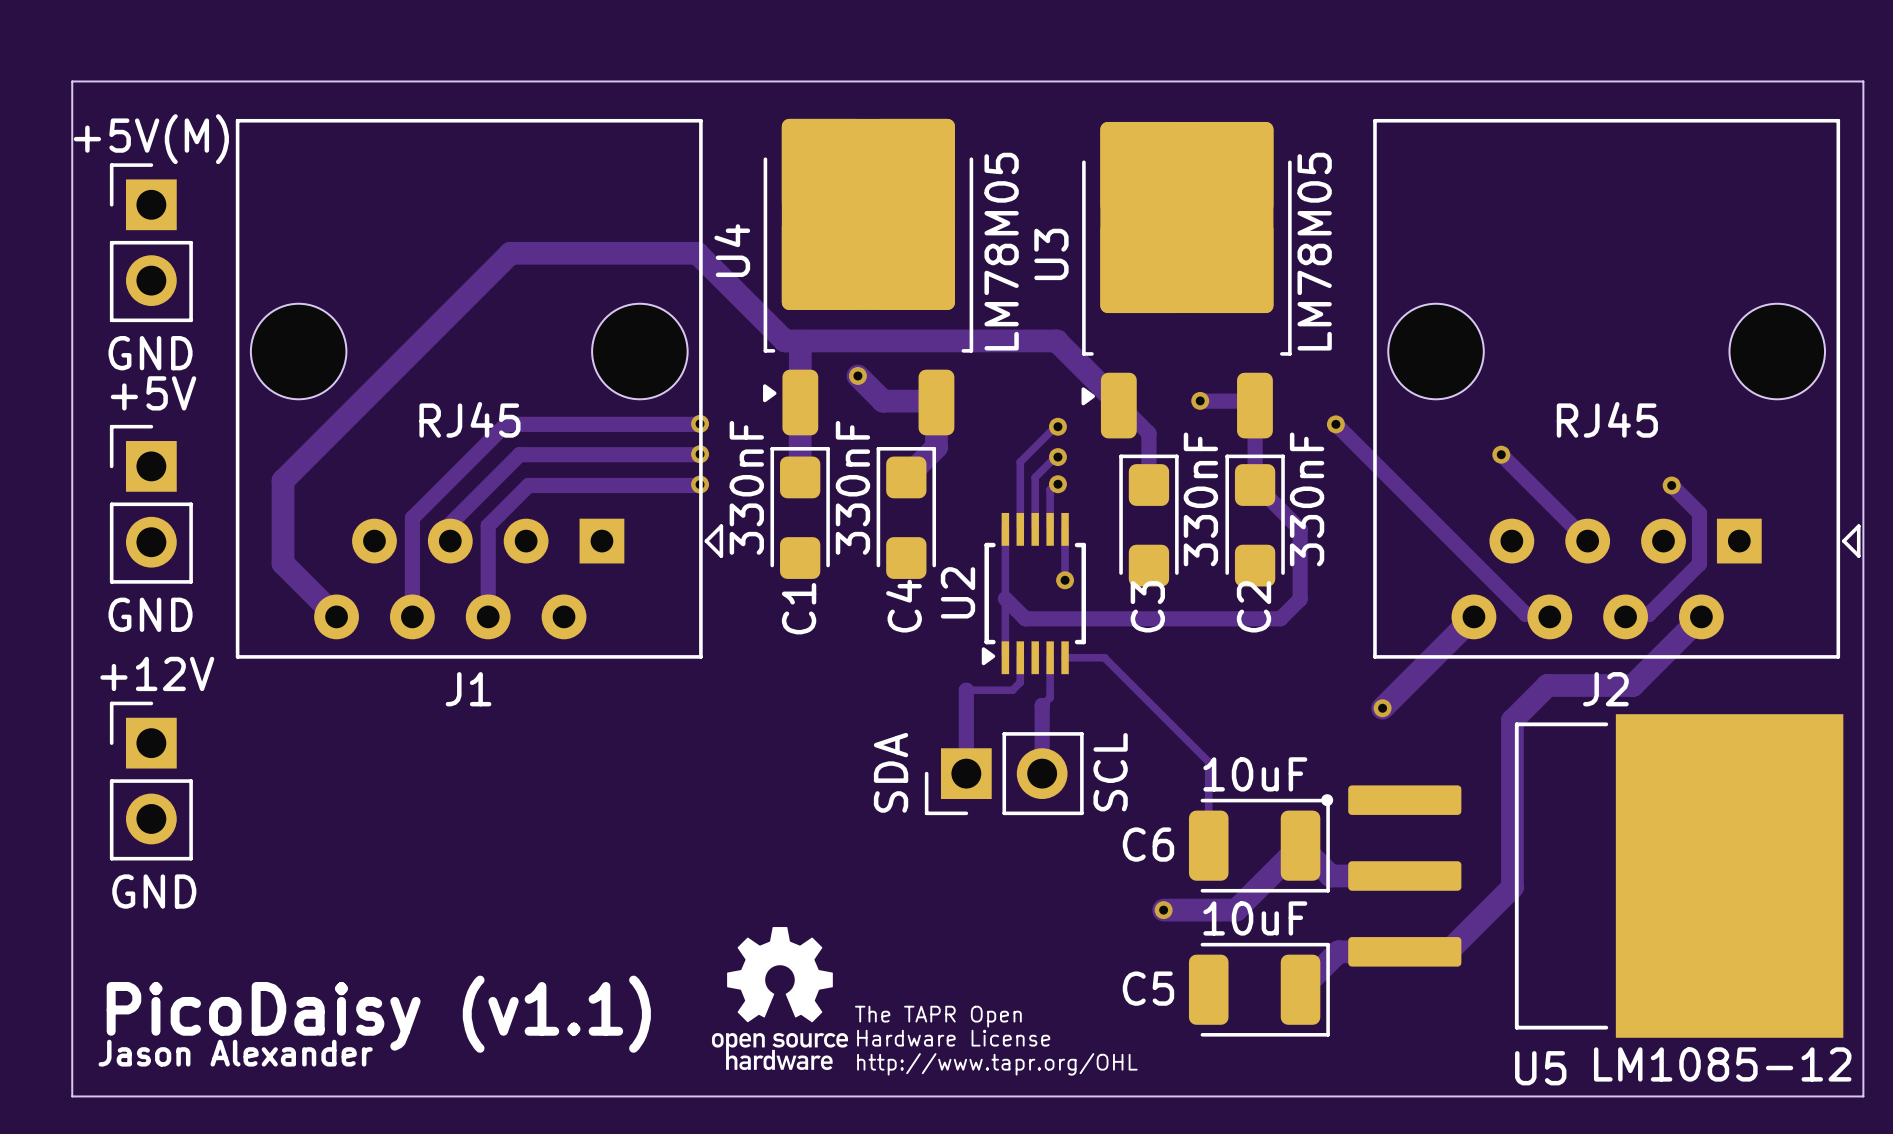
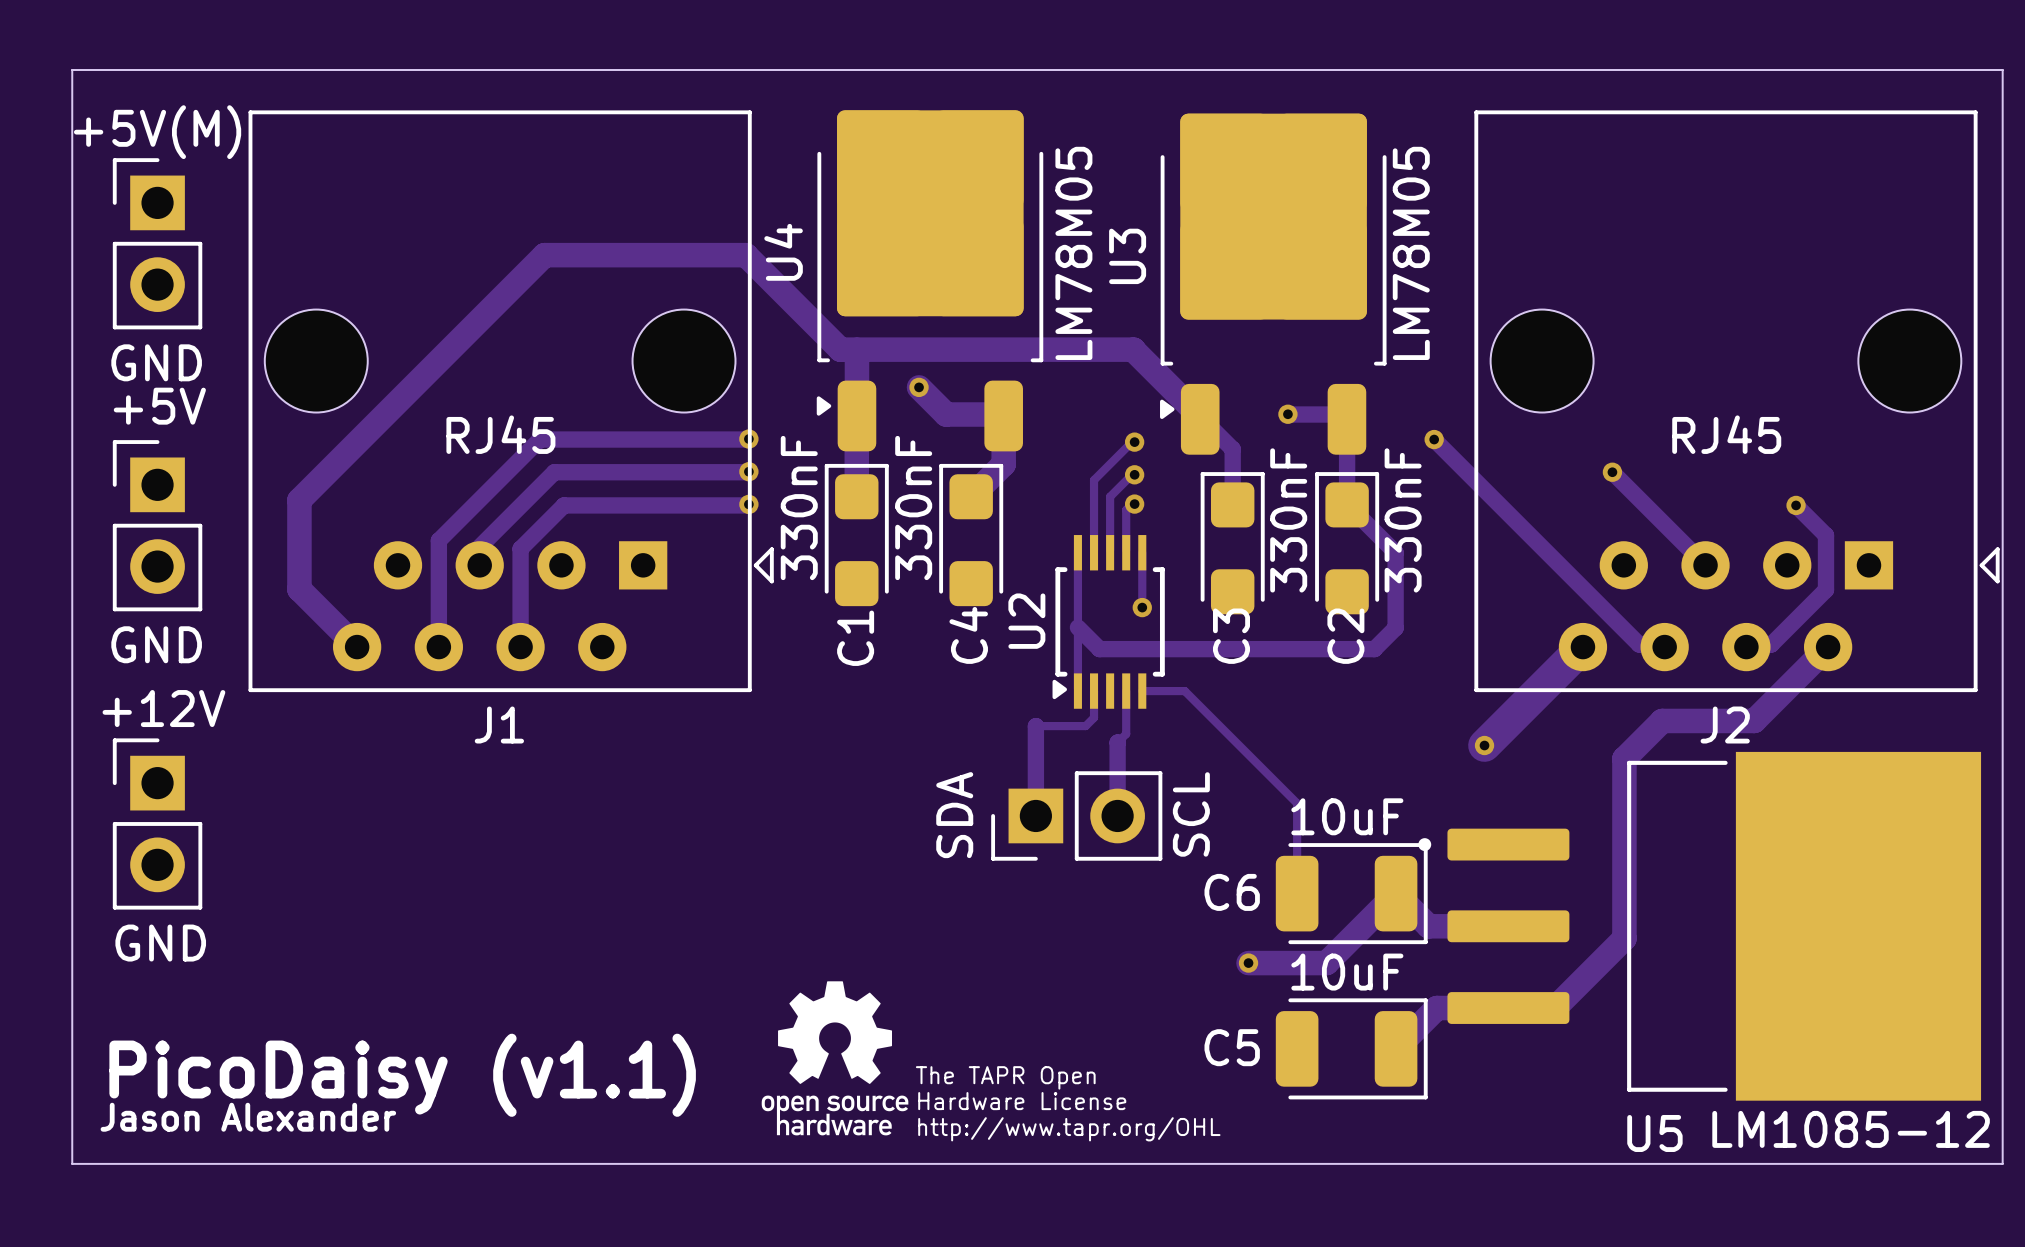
track width: thin (1473, 616) (1382, 708) -> thick (1582, 647) (1484, 745)

